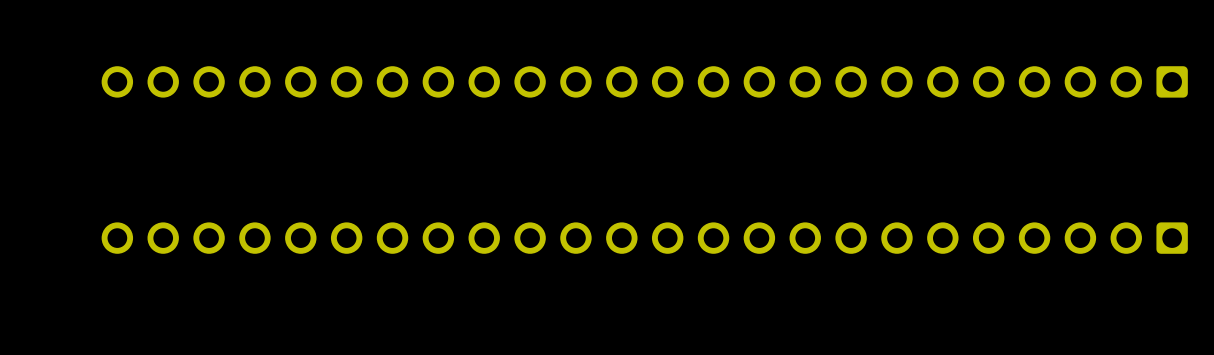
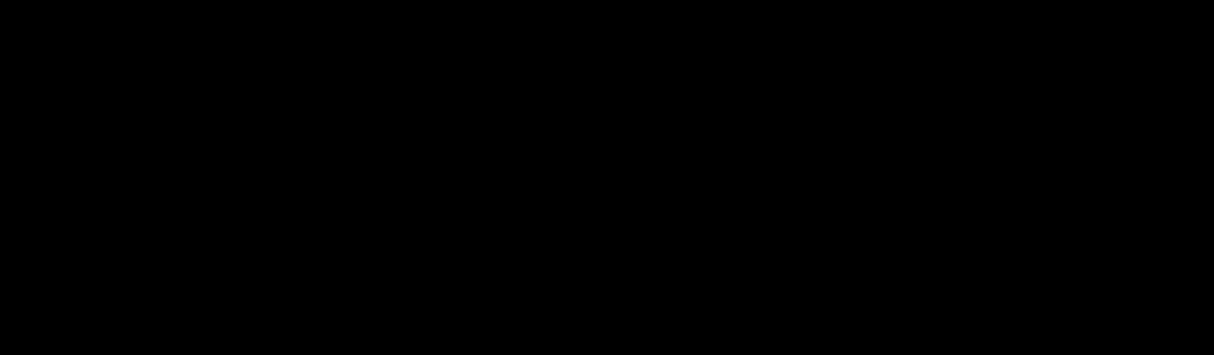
part: (644, 81) -> none
part: (644, 238) -> none

